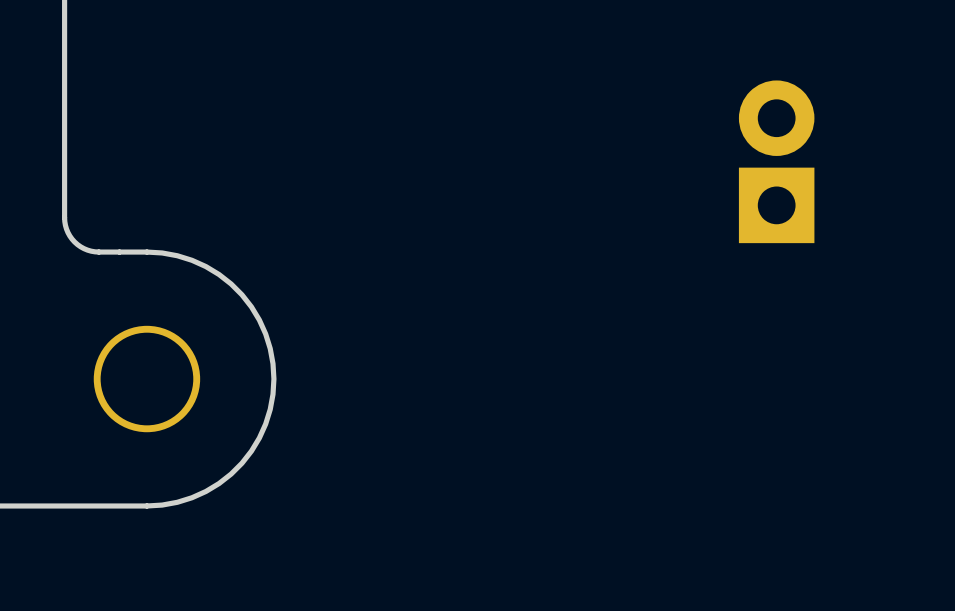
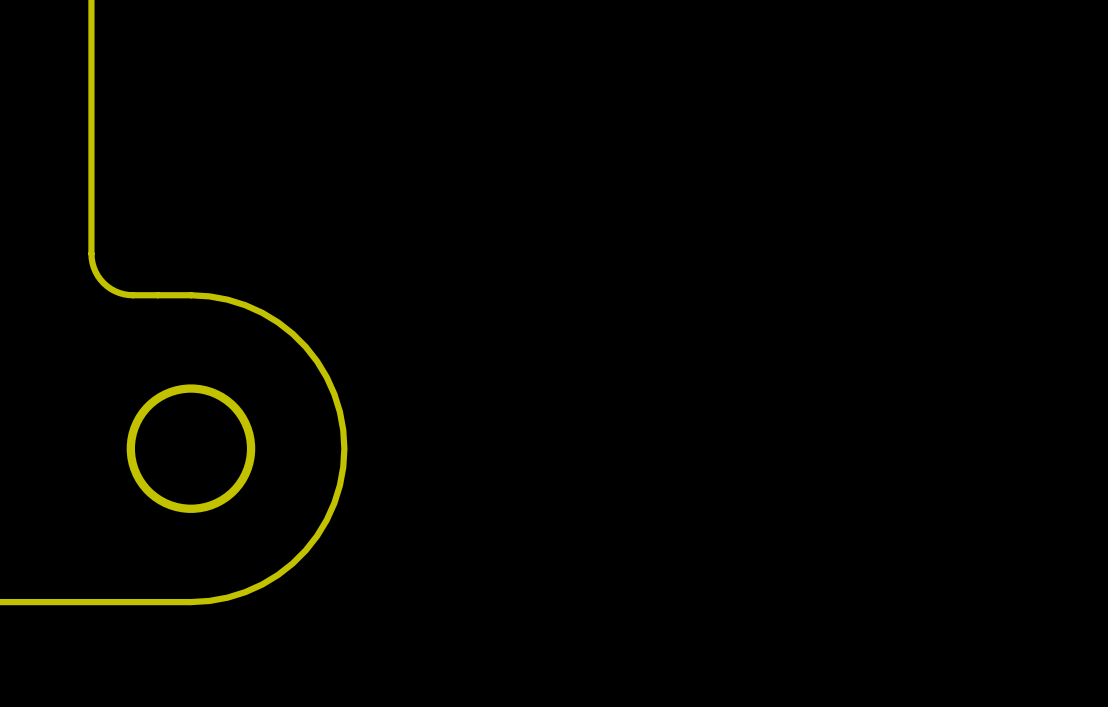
part: (776, 161) -> none

